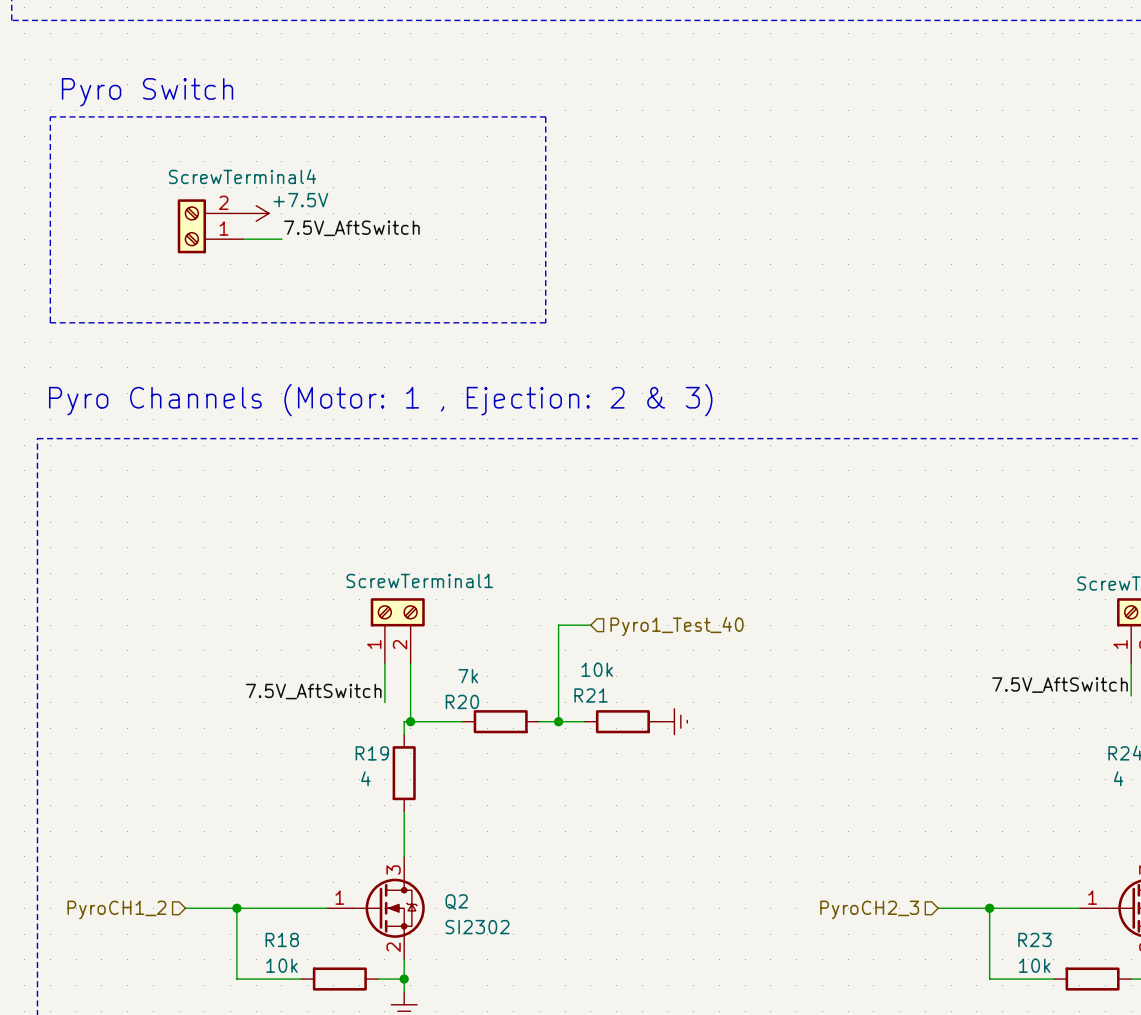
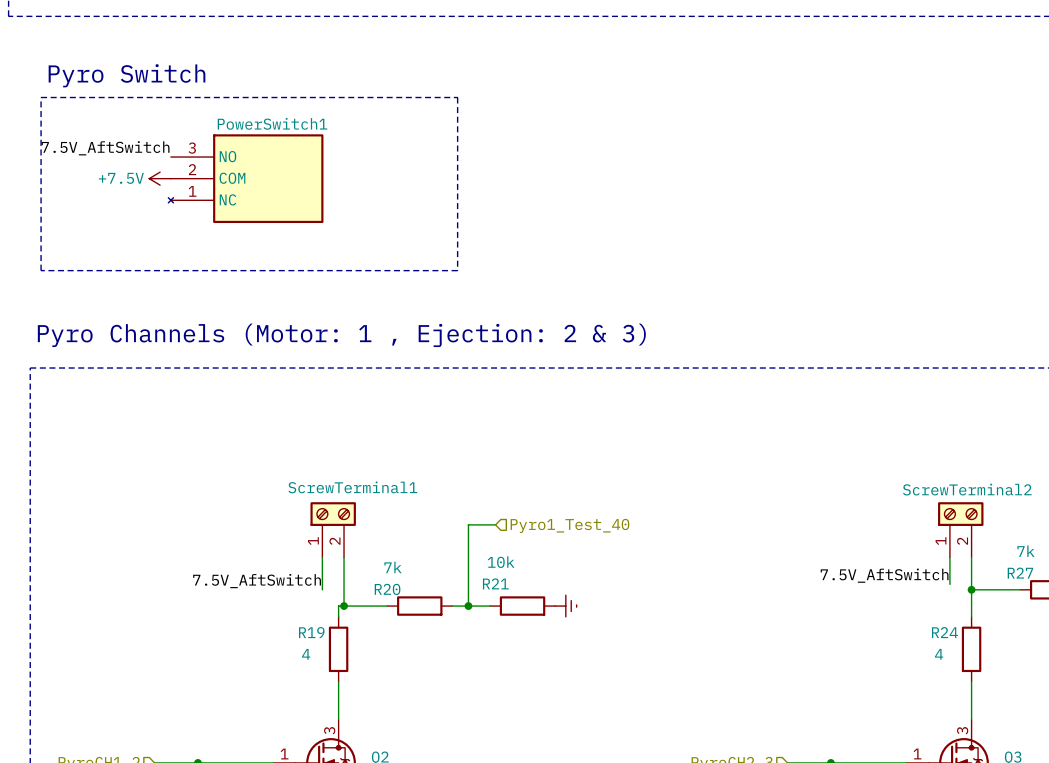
power symbol rotation: 0° (256, 213) -> 180° (160, 178)
power symbol position: +7.5V (256, 213) -> +7.5V (160, 178)
PowerSwitch1: none -> (245, 178)
ScrewTerminal4: (210, 226) -> none
label position: 7.5V_AftSwitch (351, 228) -> 7.5V_AftSwitch (105, 148)

